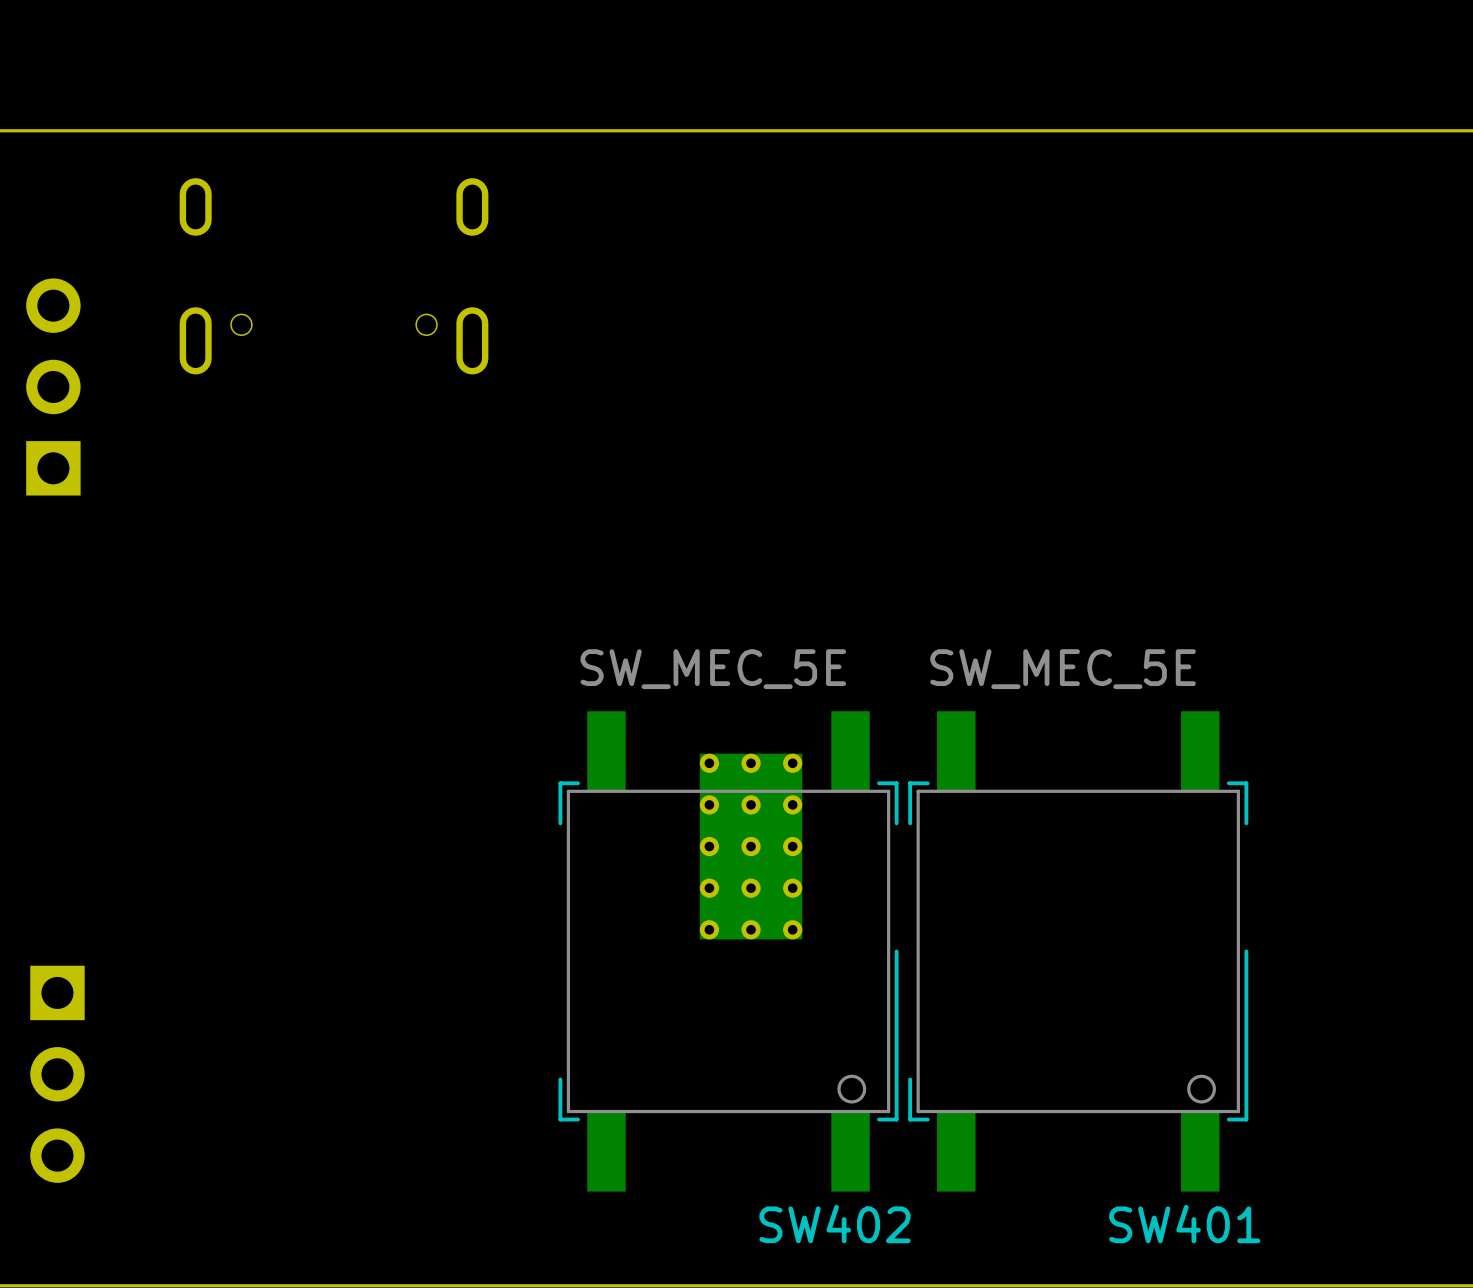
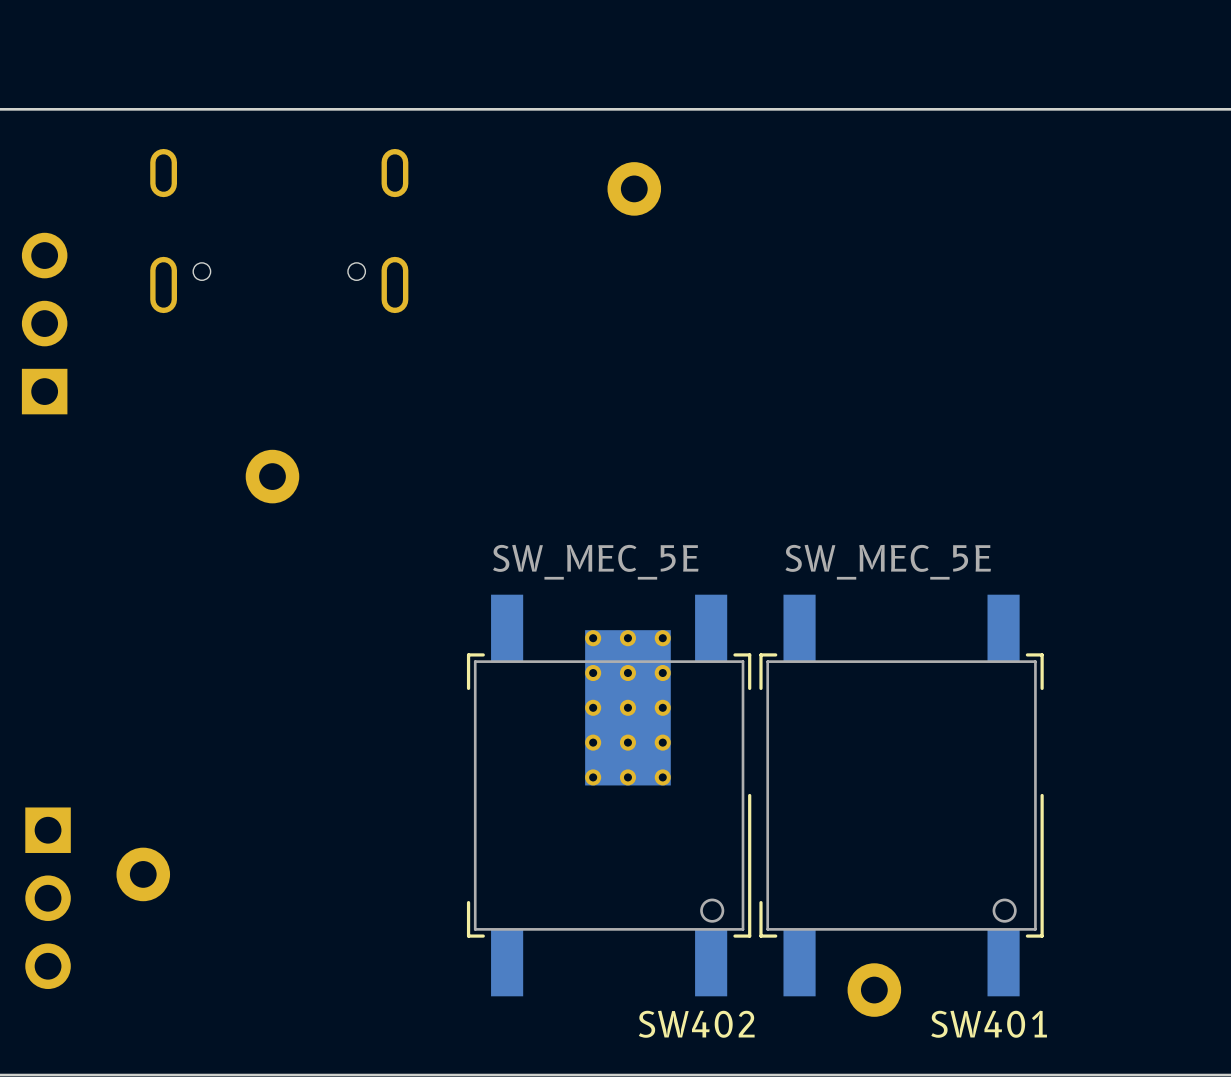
part: none -> (634, 188)
part: none -> (272, 476)
part: none -> (143, 874)
part: none -> (874, 990)

